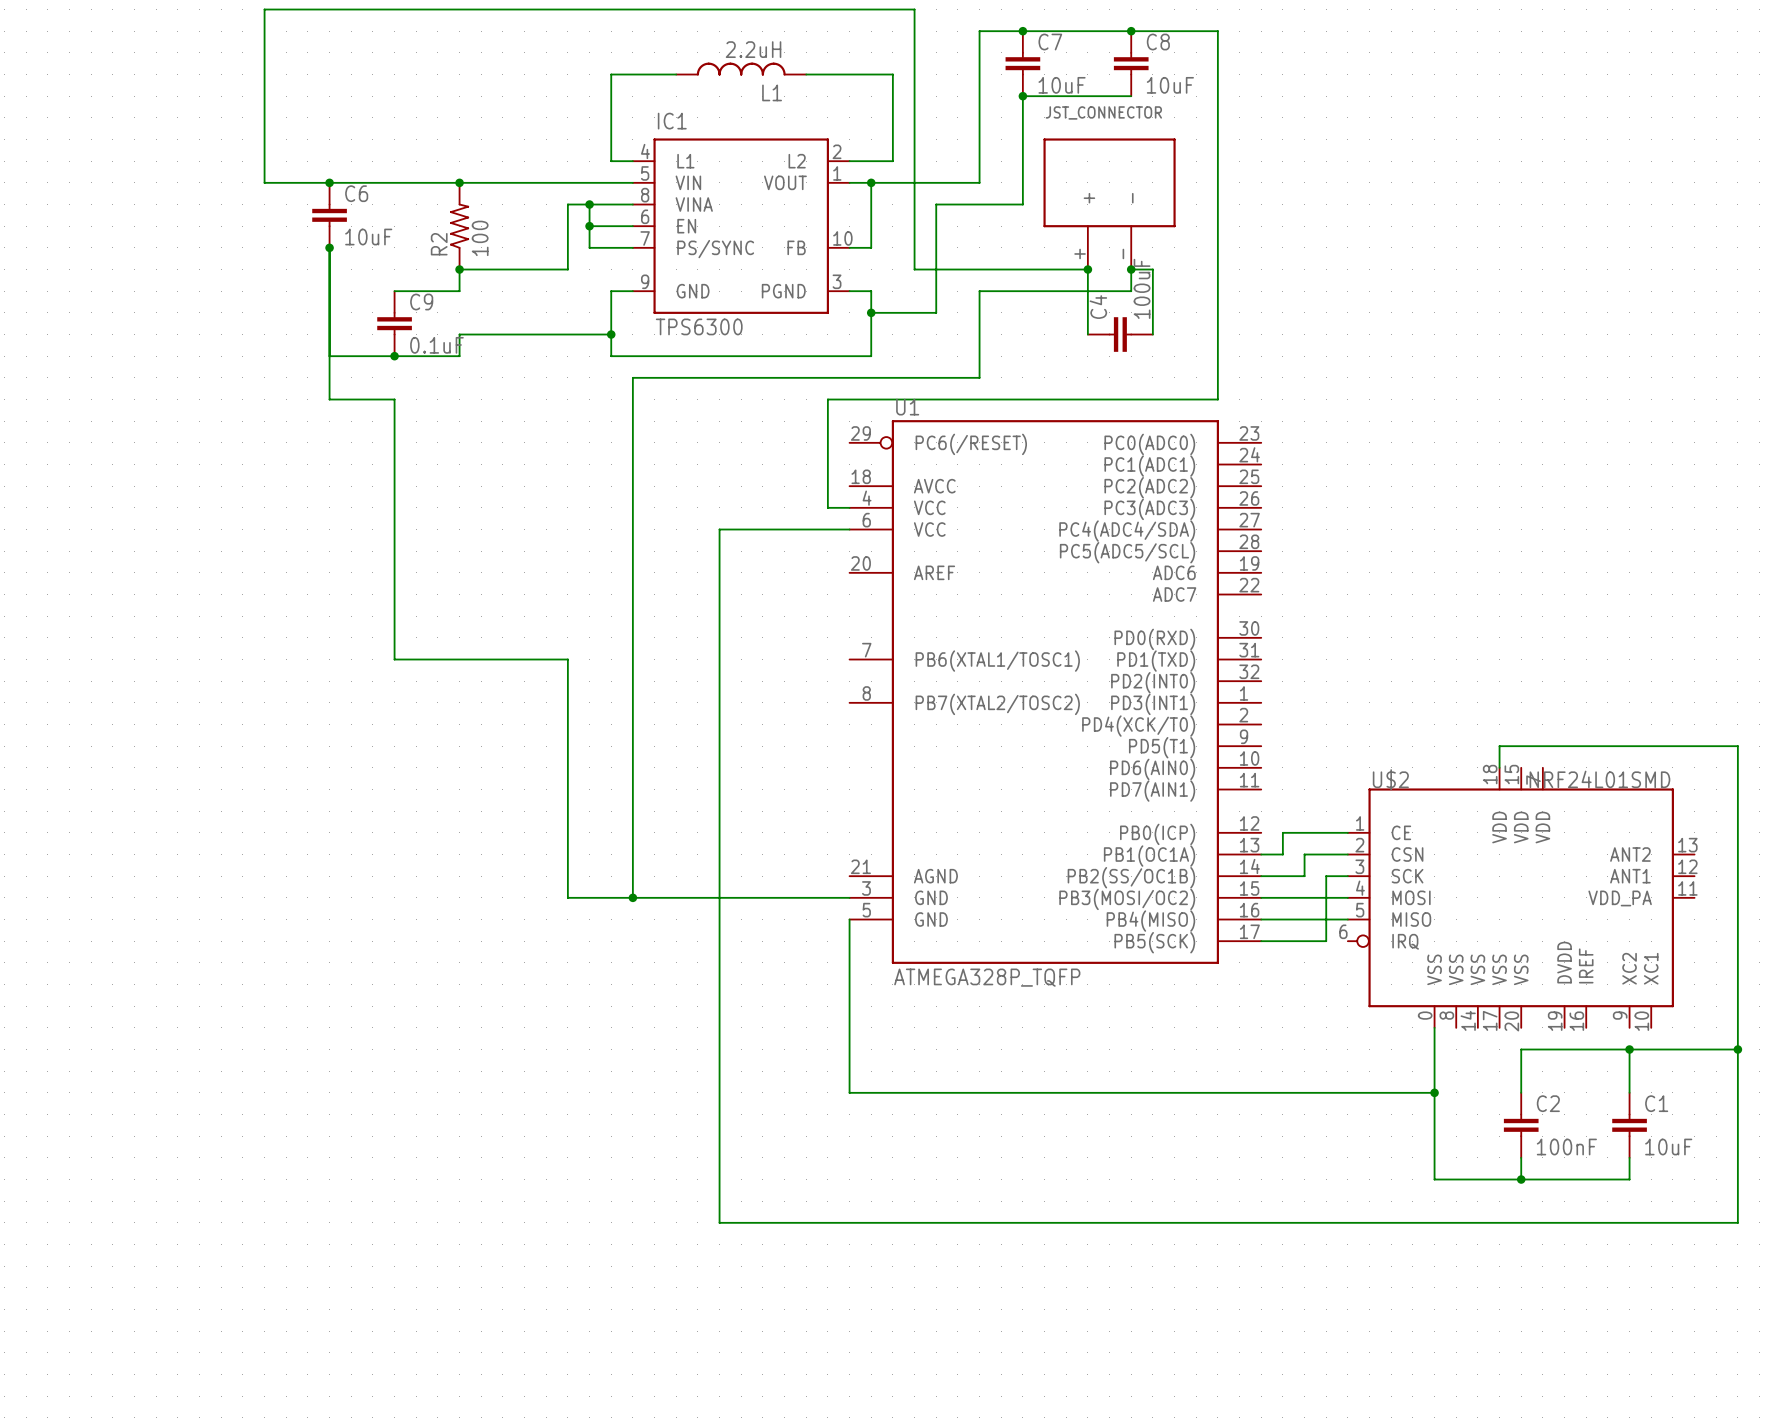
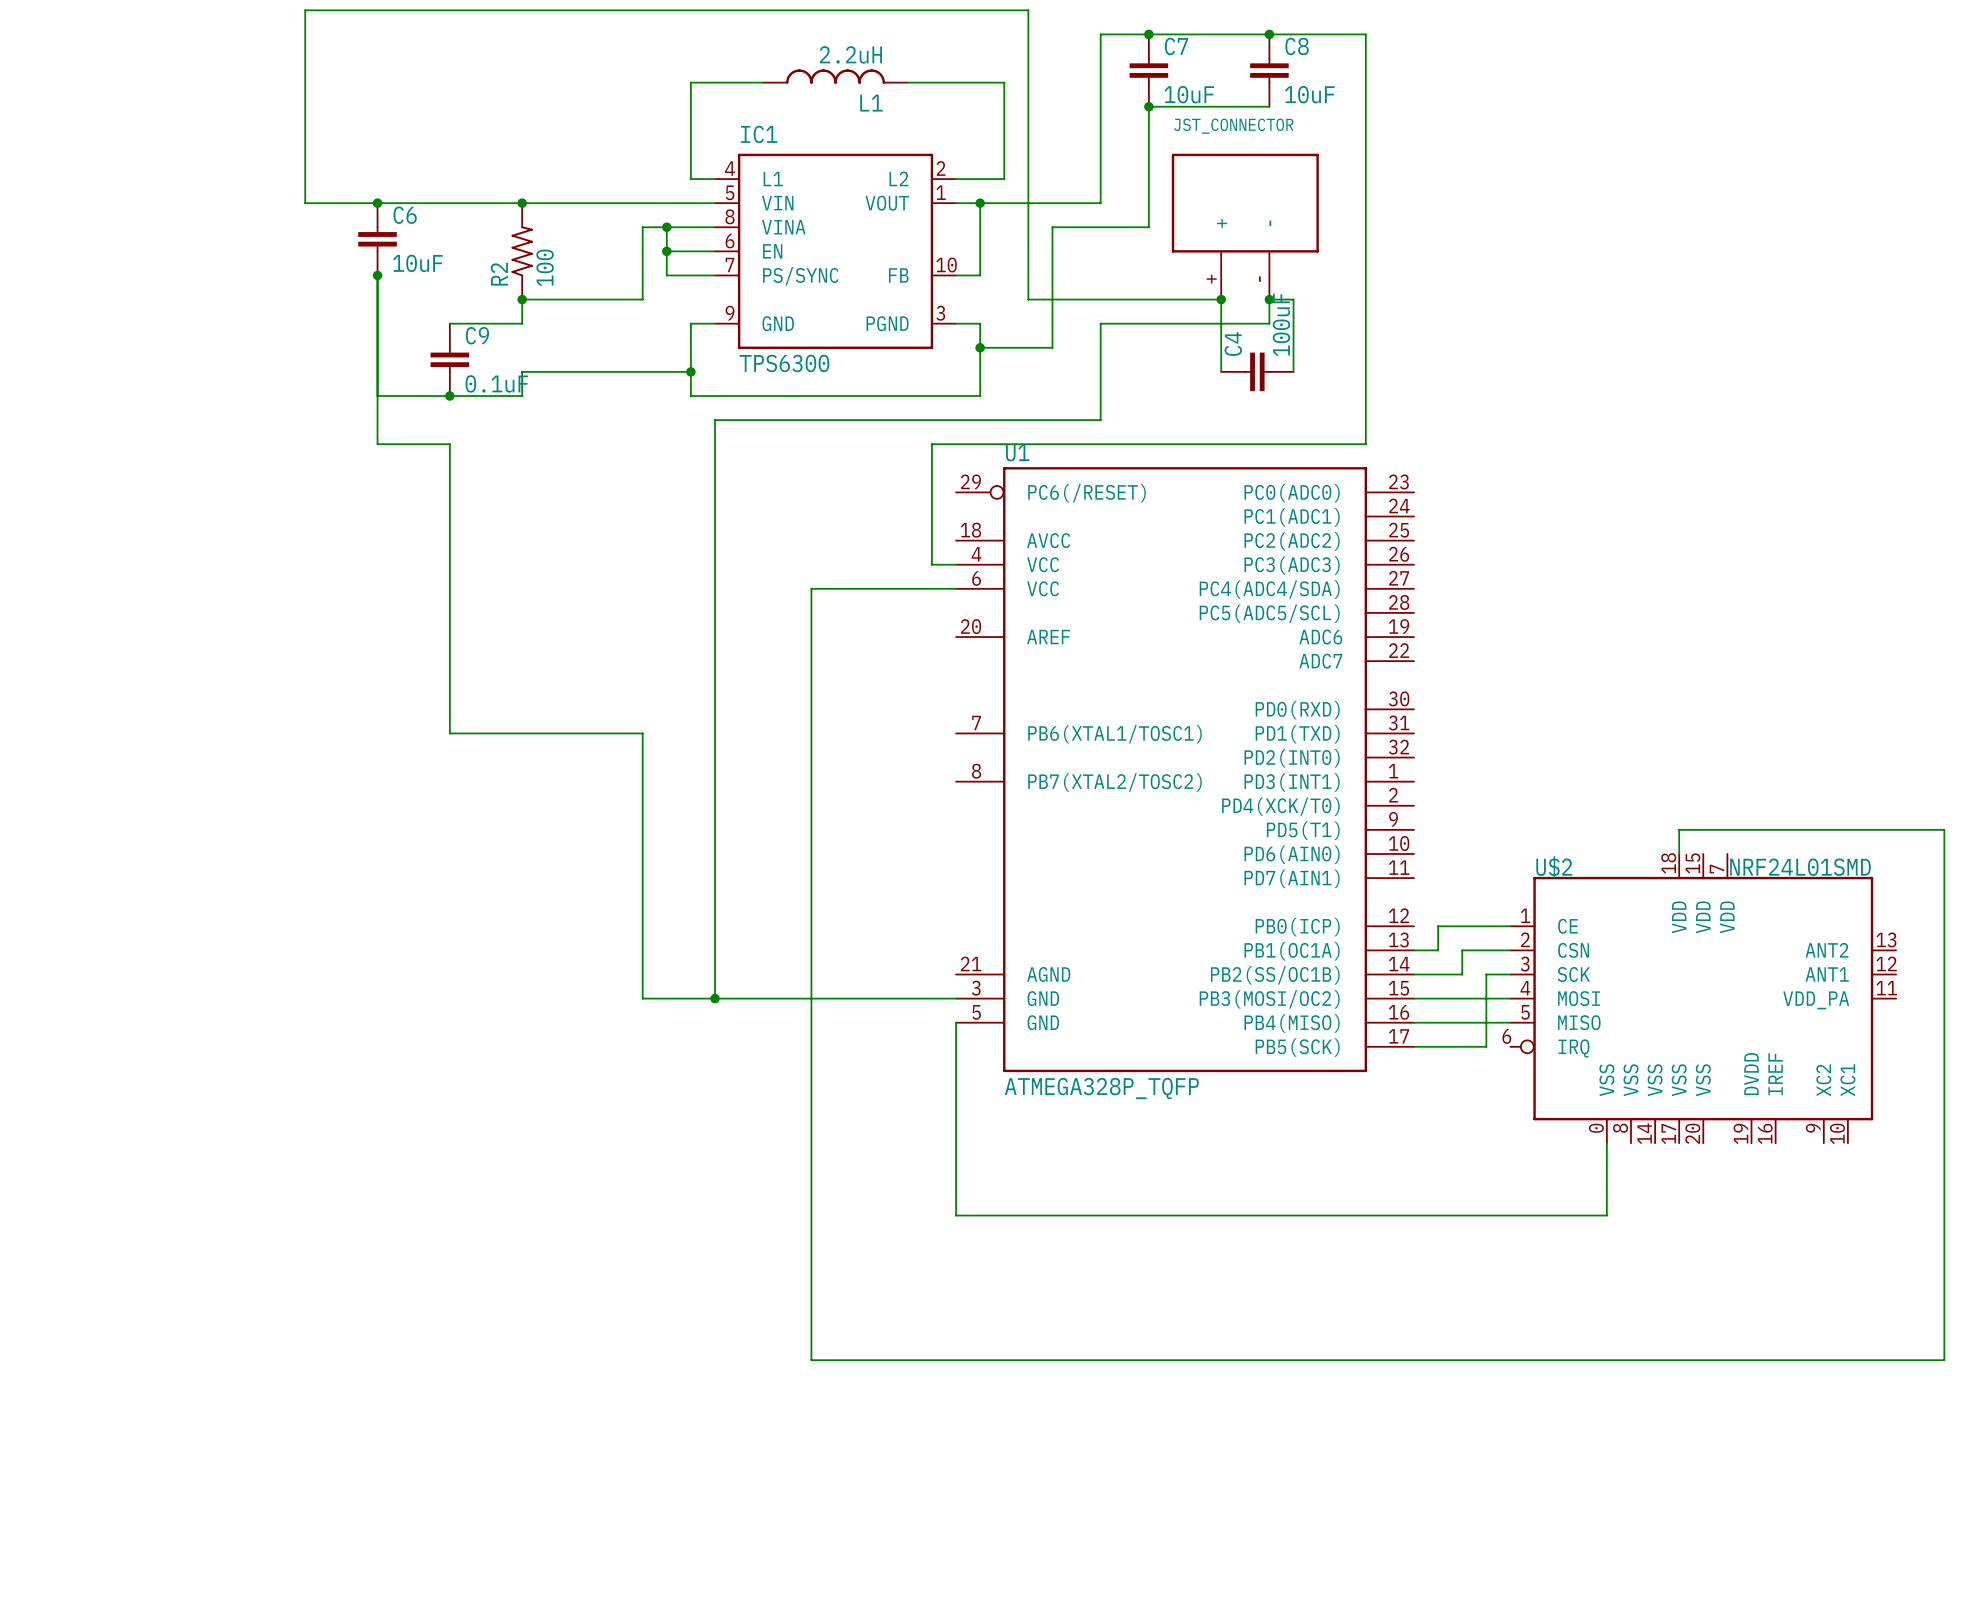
wire: (1629, 1049) (1629, 1092) -> none
junction: (1629, 1049) -> none
wire: (1737, 1049) (1521, 1049) (1521, 1092) -> none
junction: (1737, 1049) -> none
wire: (1434, 1092) (1434, 1179) (1629, 1179) (1629, 1157) -> none
junction: (1434, 1092) -> none
C2: 100nF (1521, 1125) -> none
C1: 10uF (1629, 1125) -> none
wire: (1521, 1157) (1521, 1179) -> none
junction: (1521, 1179) -> none

